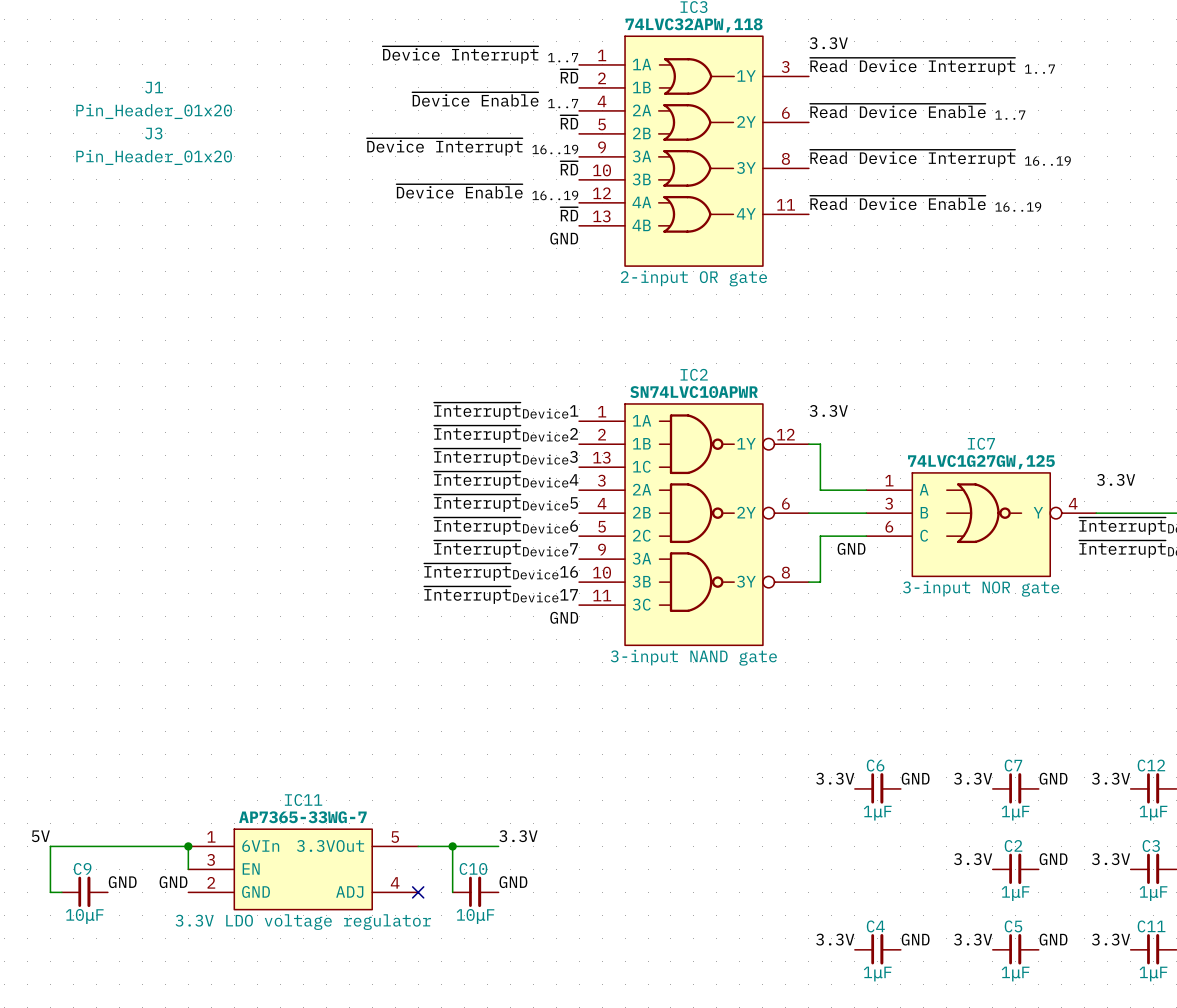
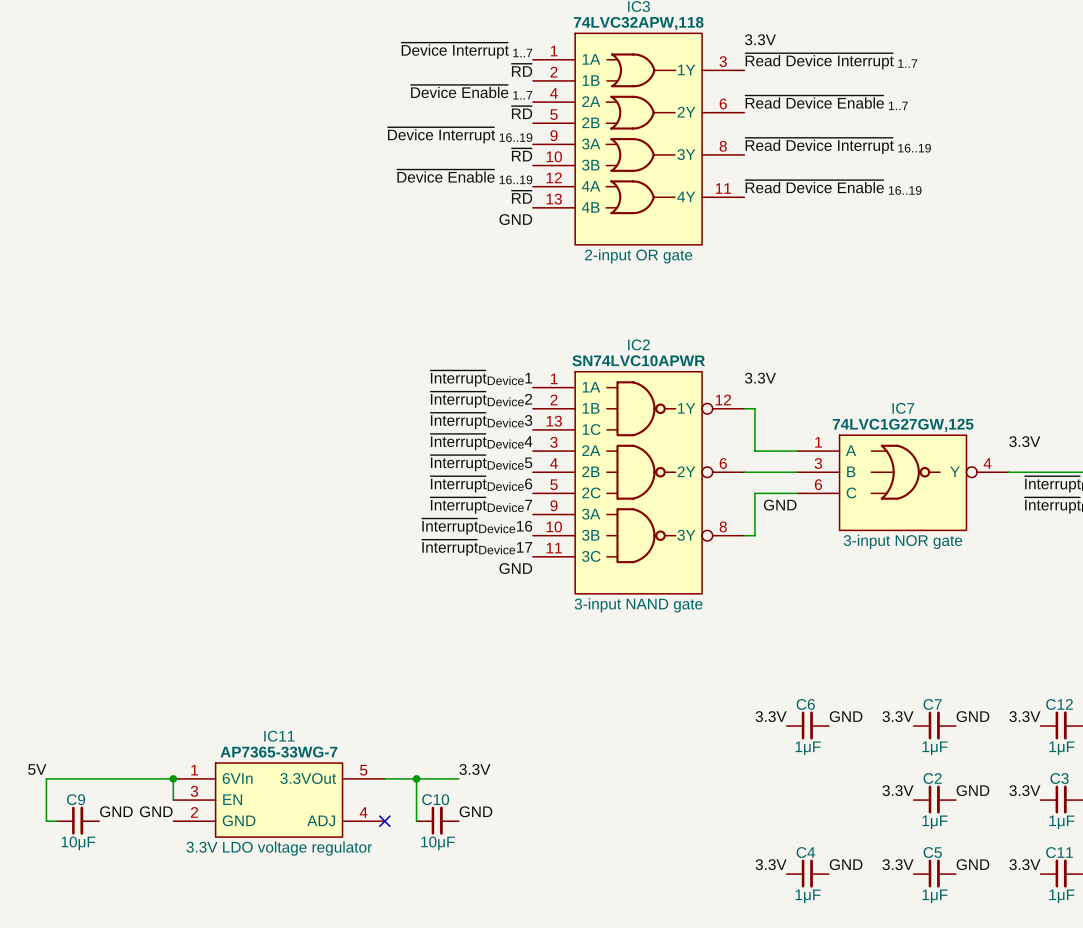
J1: Pin_Header_01x20 (154, 100) -> none
J3: Pin_Header_01x20 (154, 146) -> none

